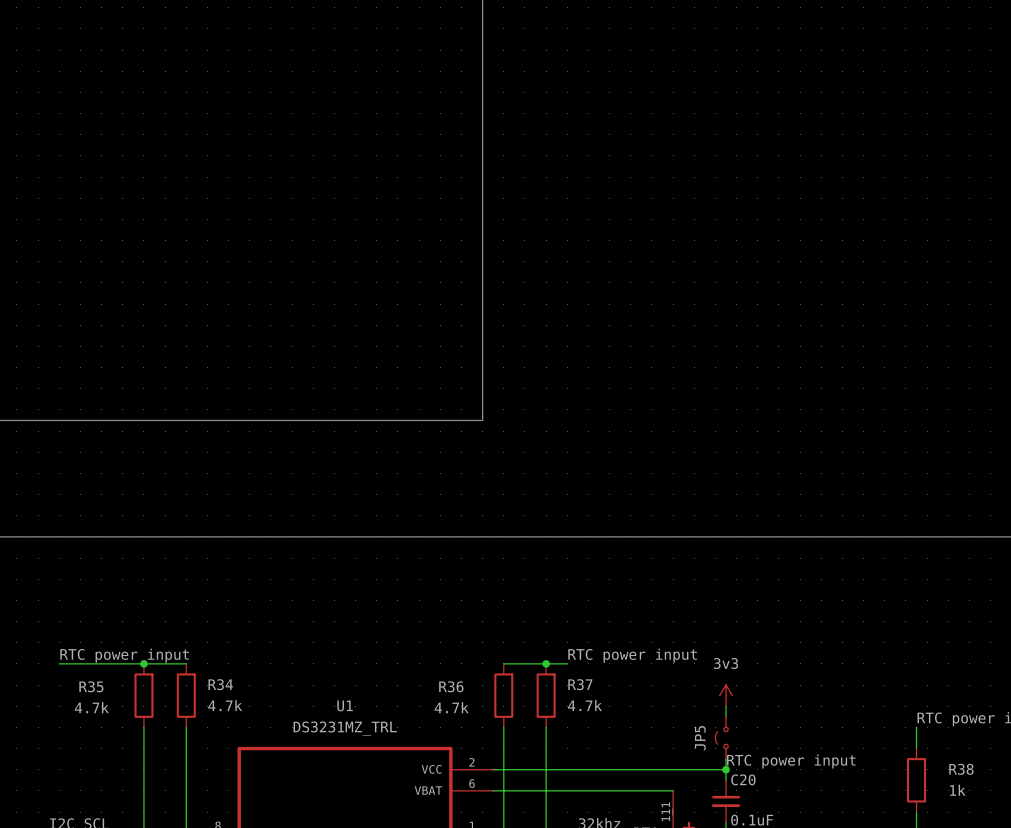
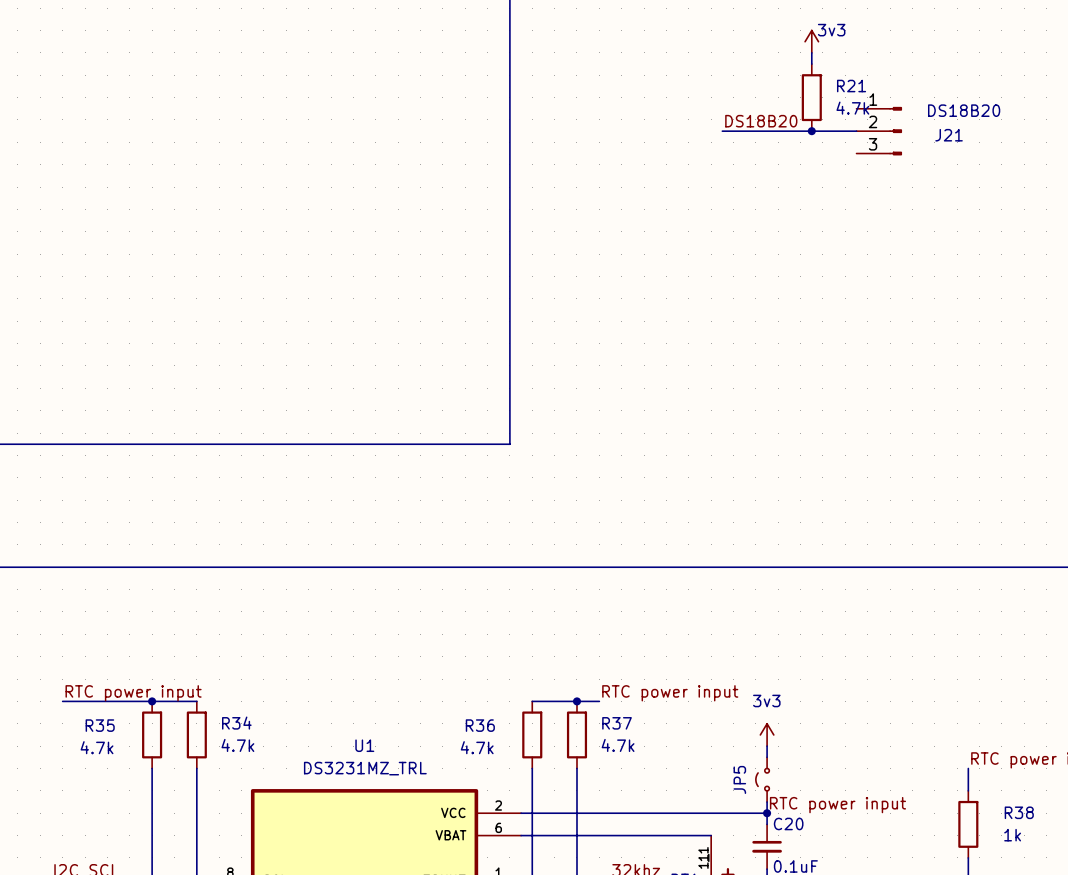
power symbol: none -> 3v3 (811, 41)
wire: none -> (811, 52) (811, 64)
R21: none -> 4.7k (811, 97)
text: none -> DS18B20 (964, 110)
label: none -> DS18B20 (761, 121)
wire: none -> (722, 131) (856, 131)
junction: none -> (811, 131)
J21: none -> (879, 131)

